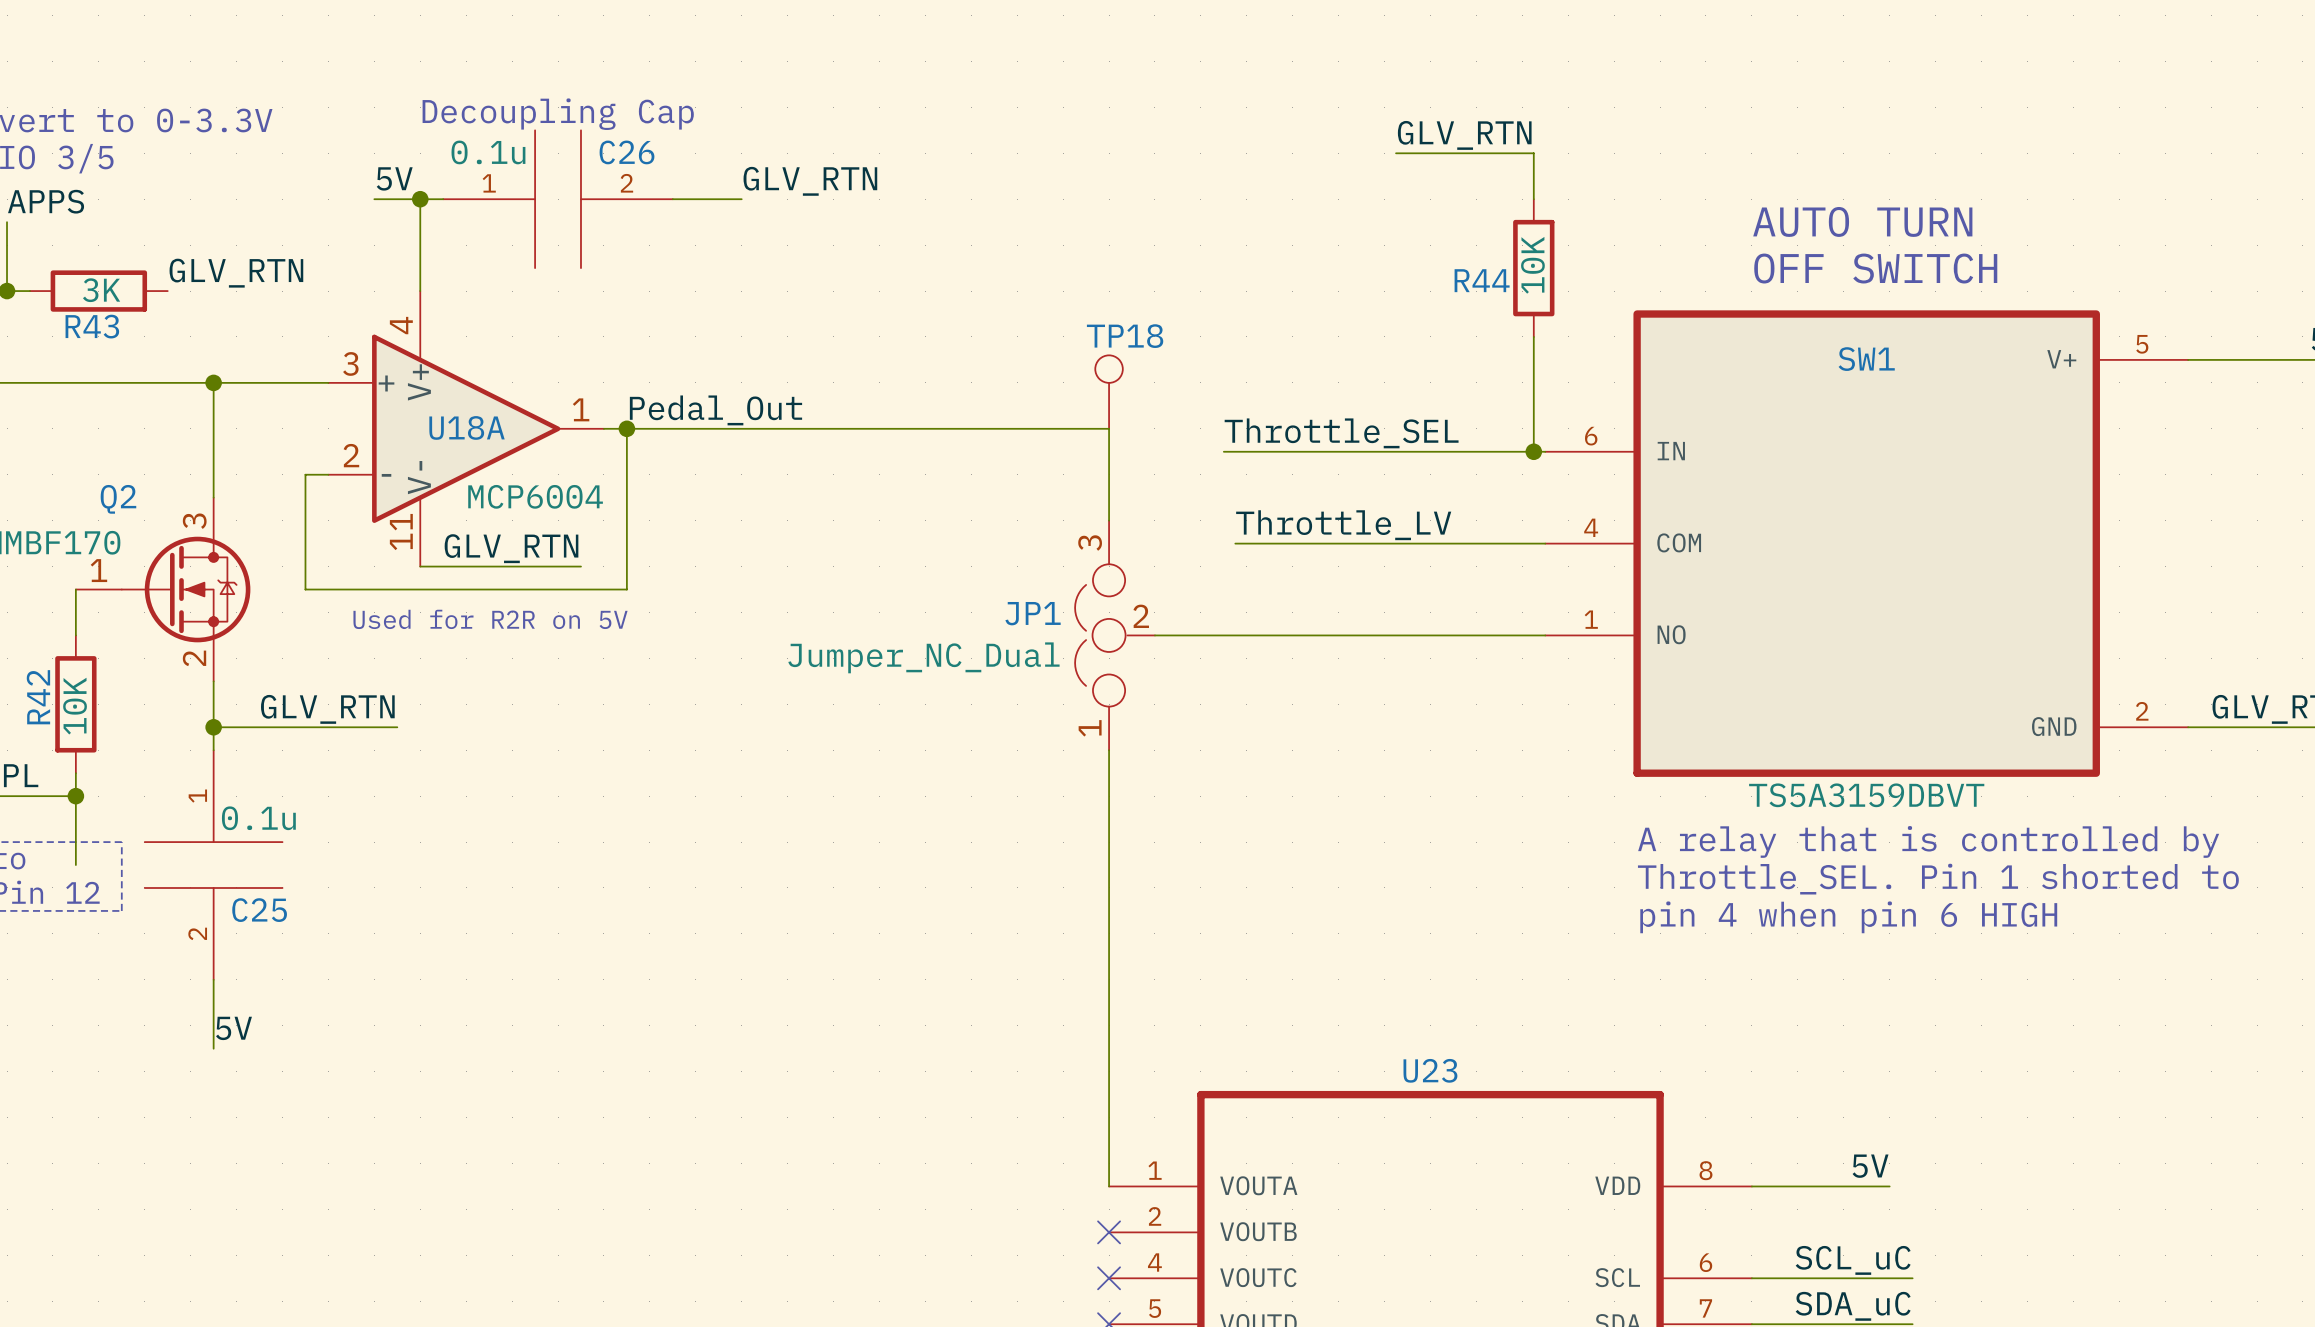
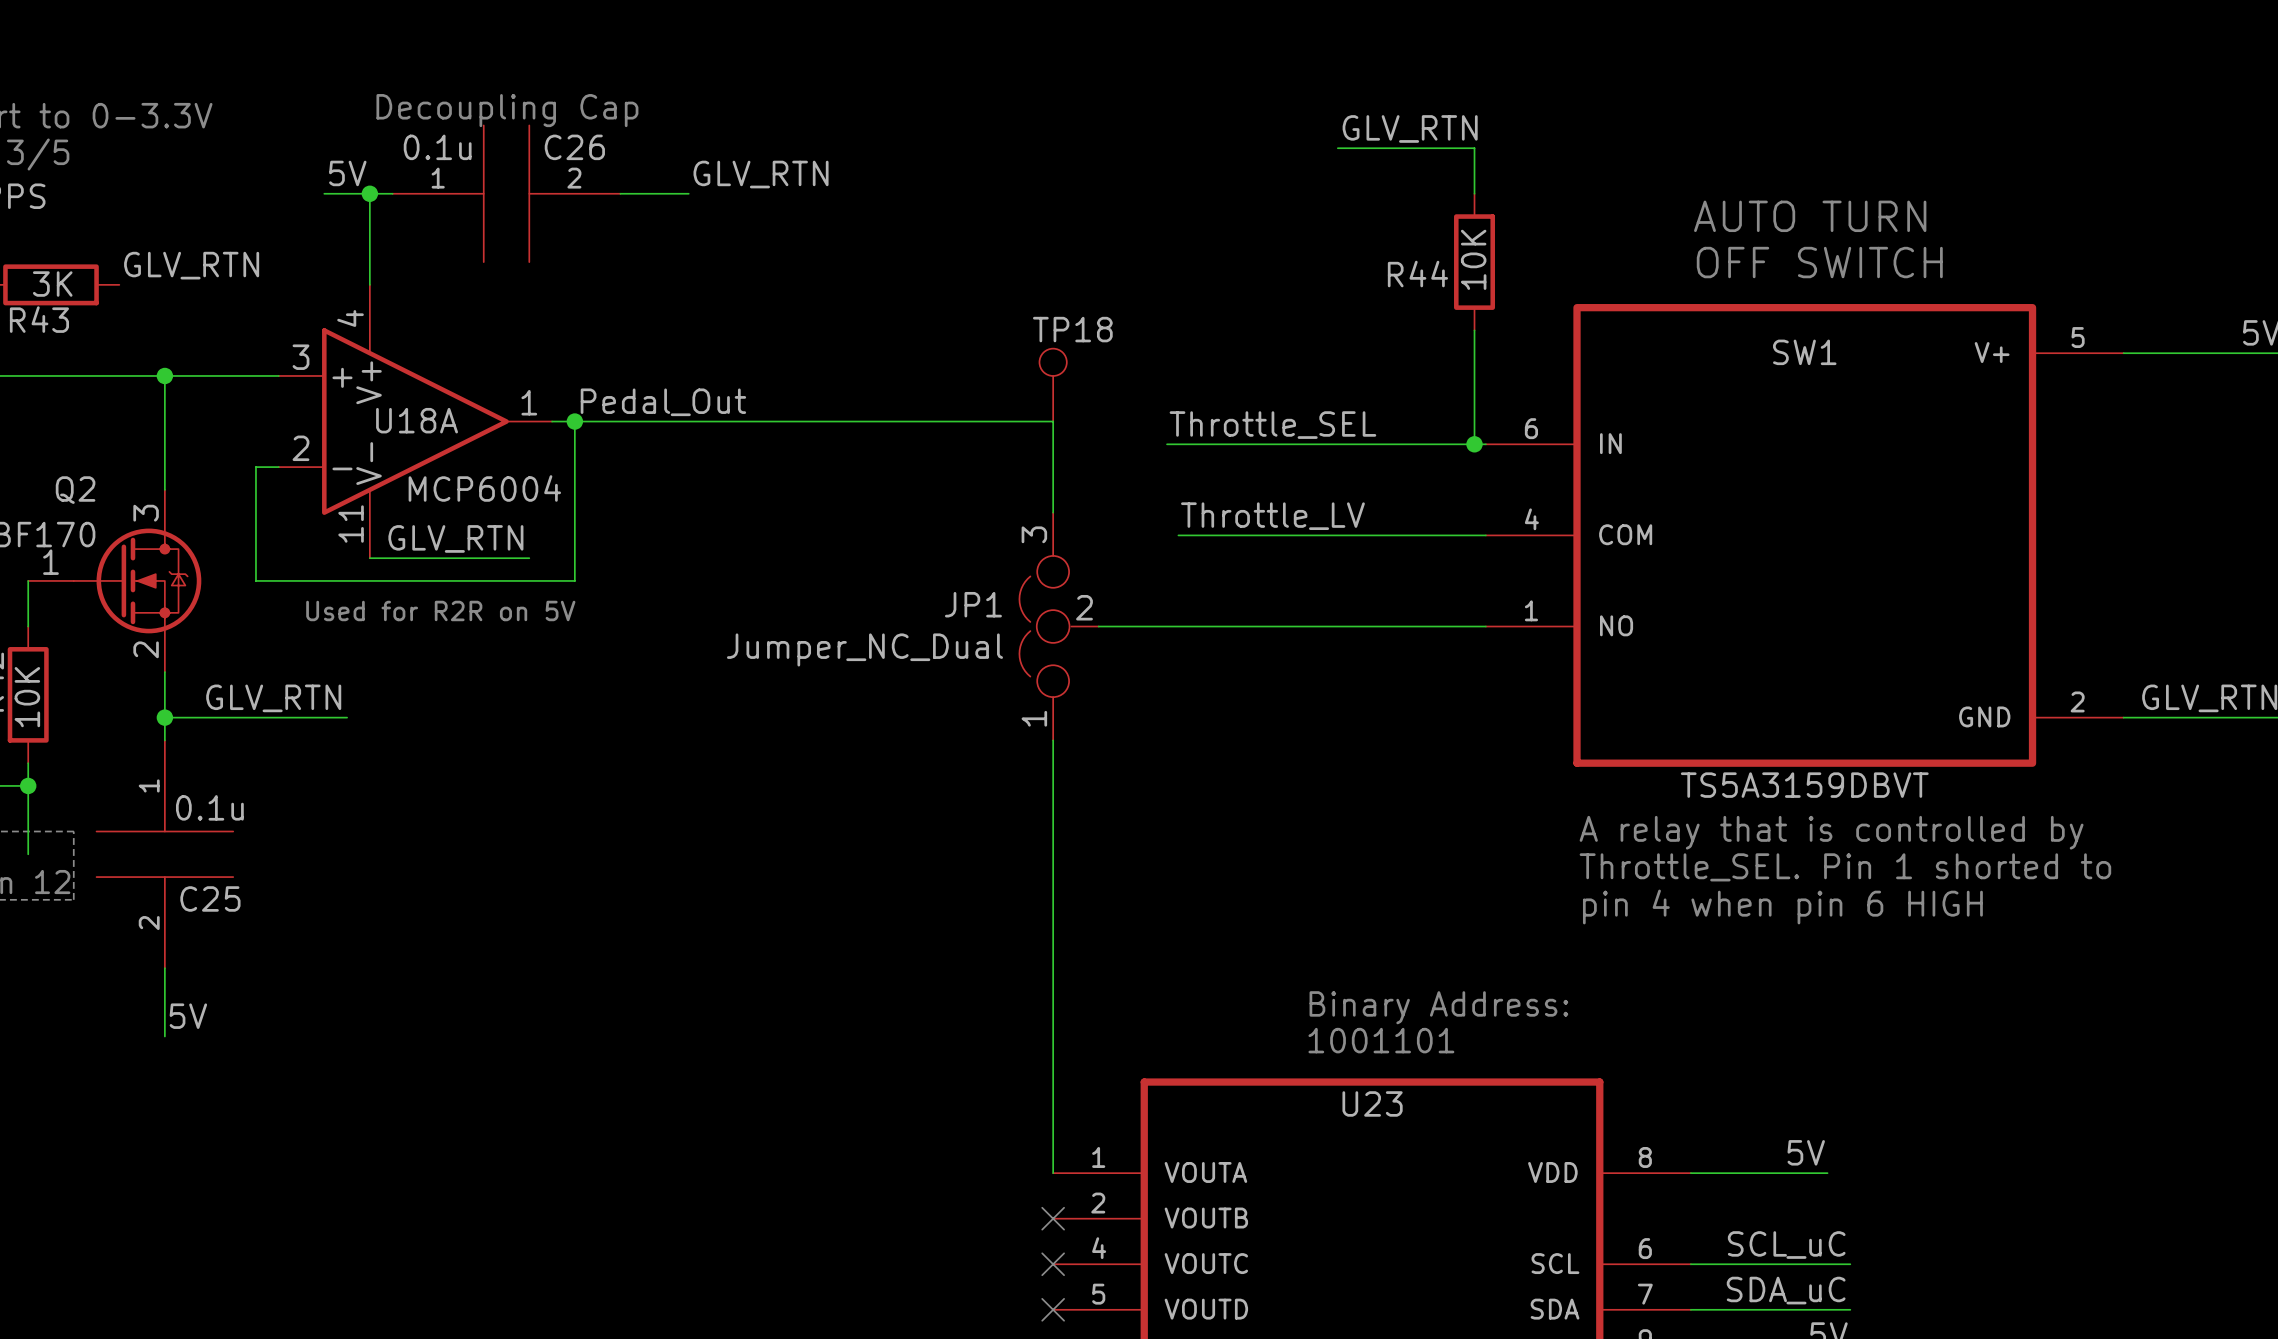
text: none -> Binary Address: (1438, 1007)
text: none -> 1001101 (1381, 1040)
U23 name position: U23 (1430, 1070) -> U23 (1372, 1103)

